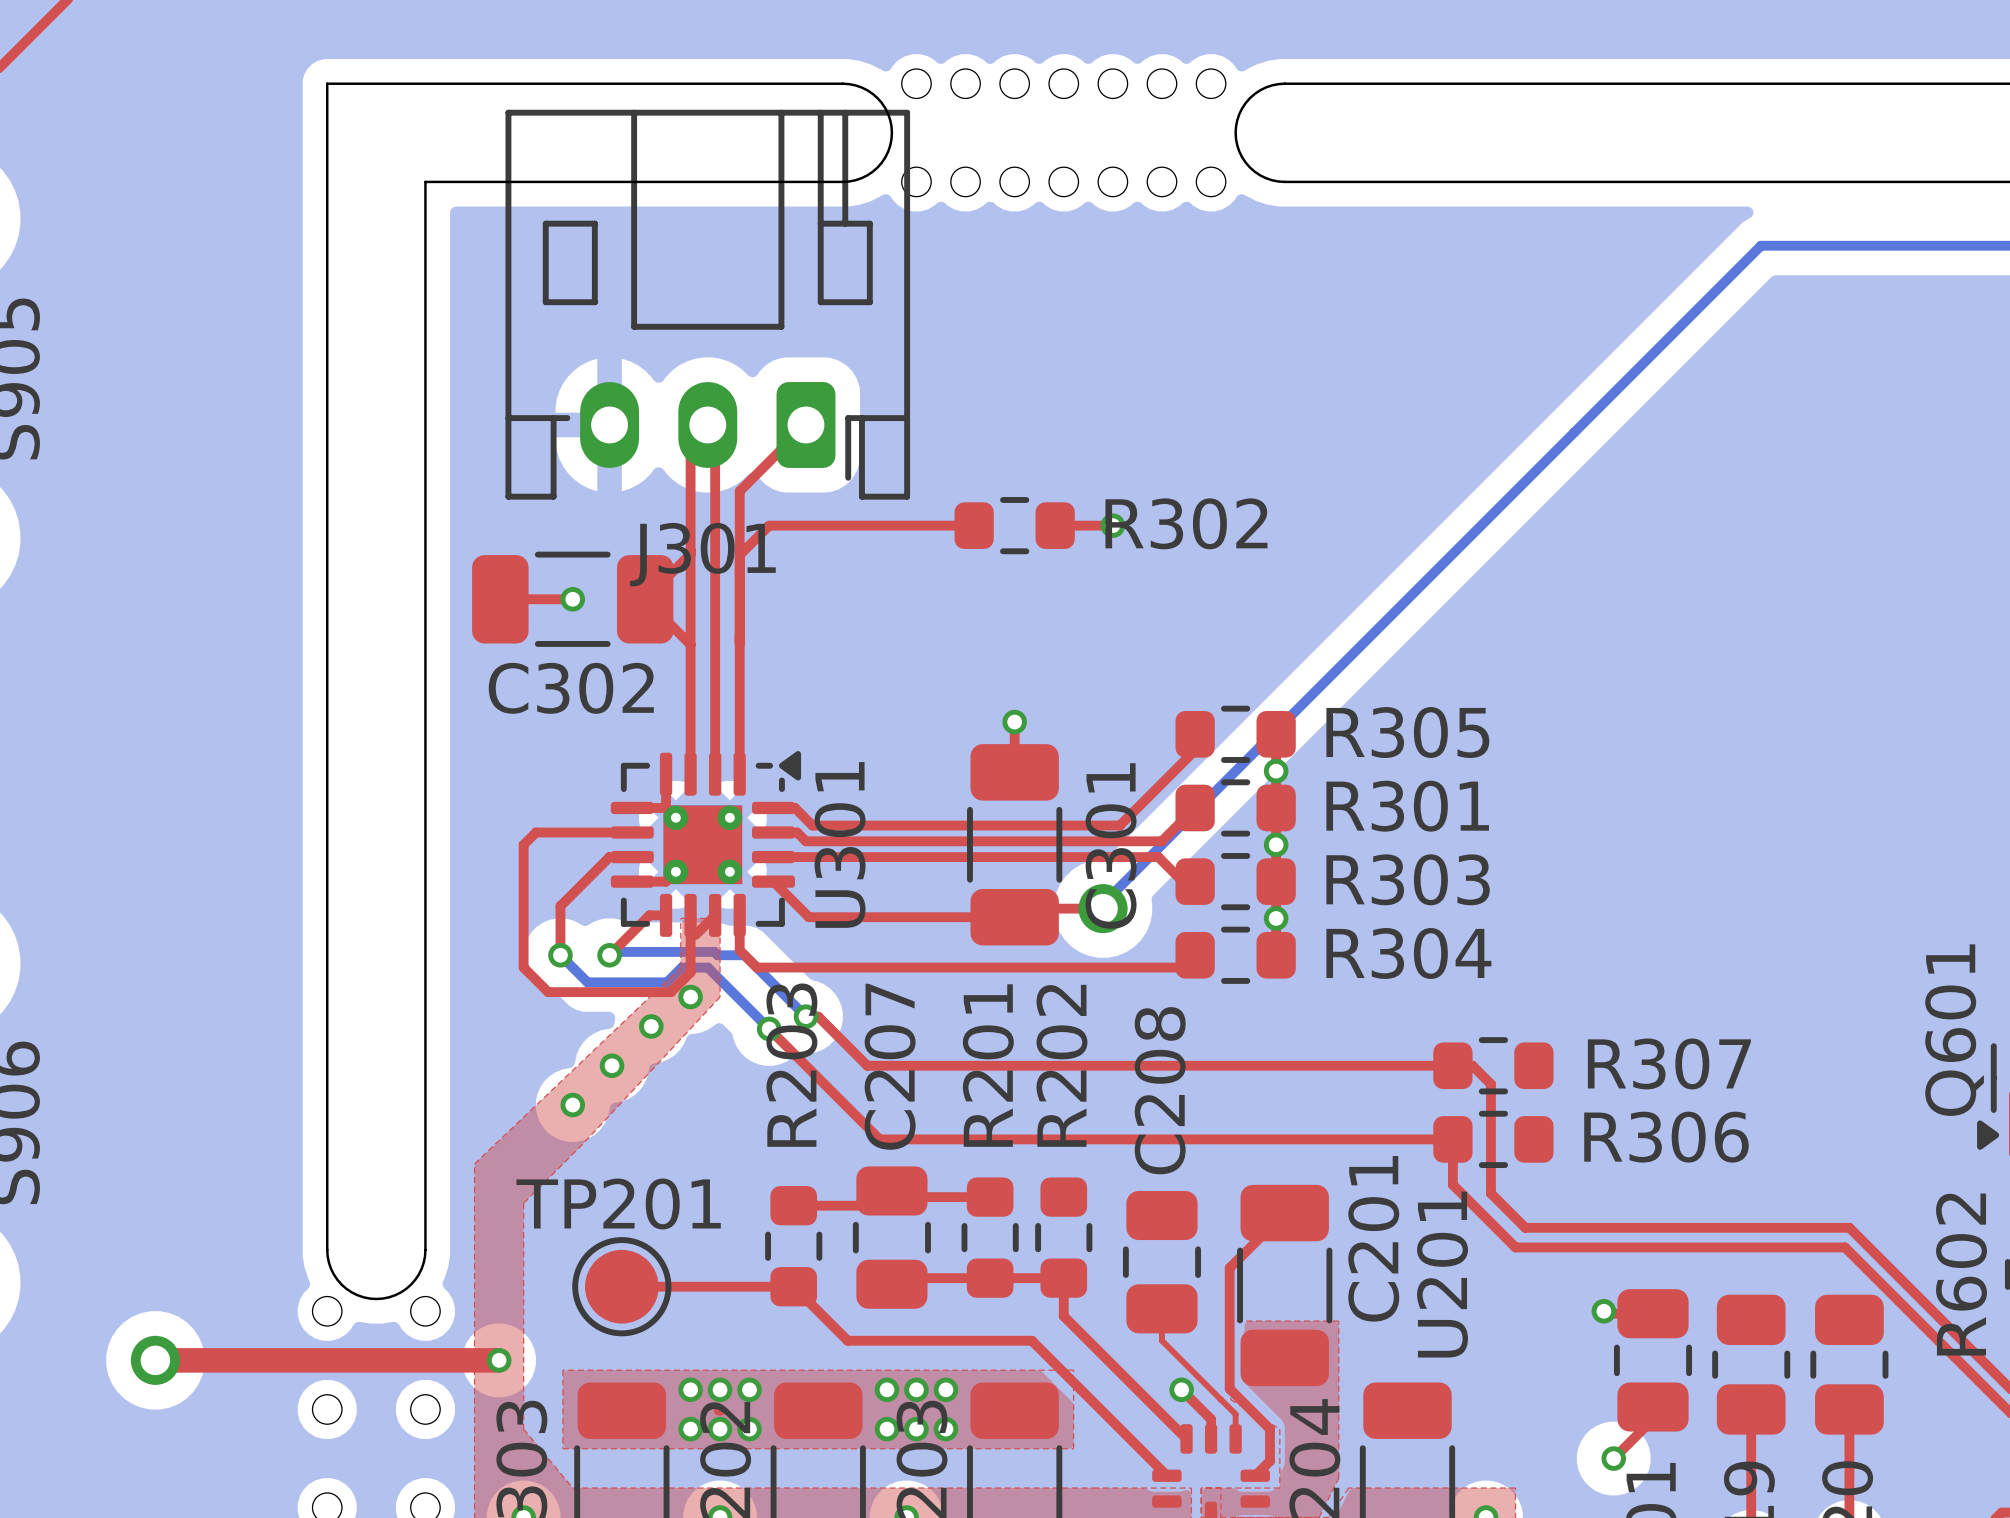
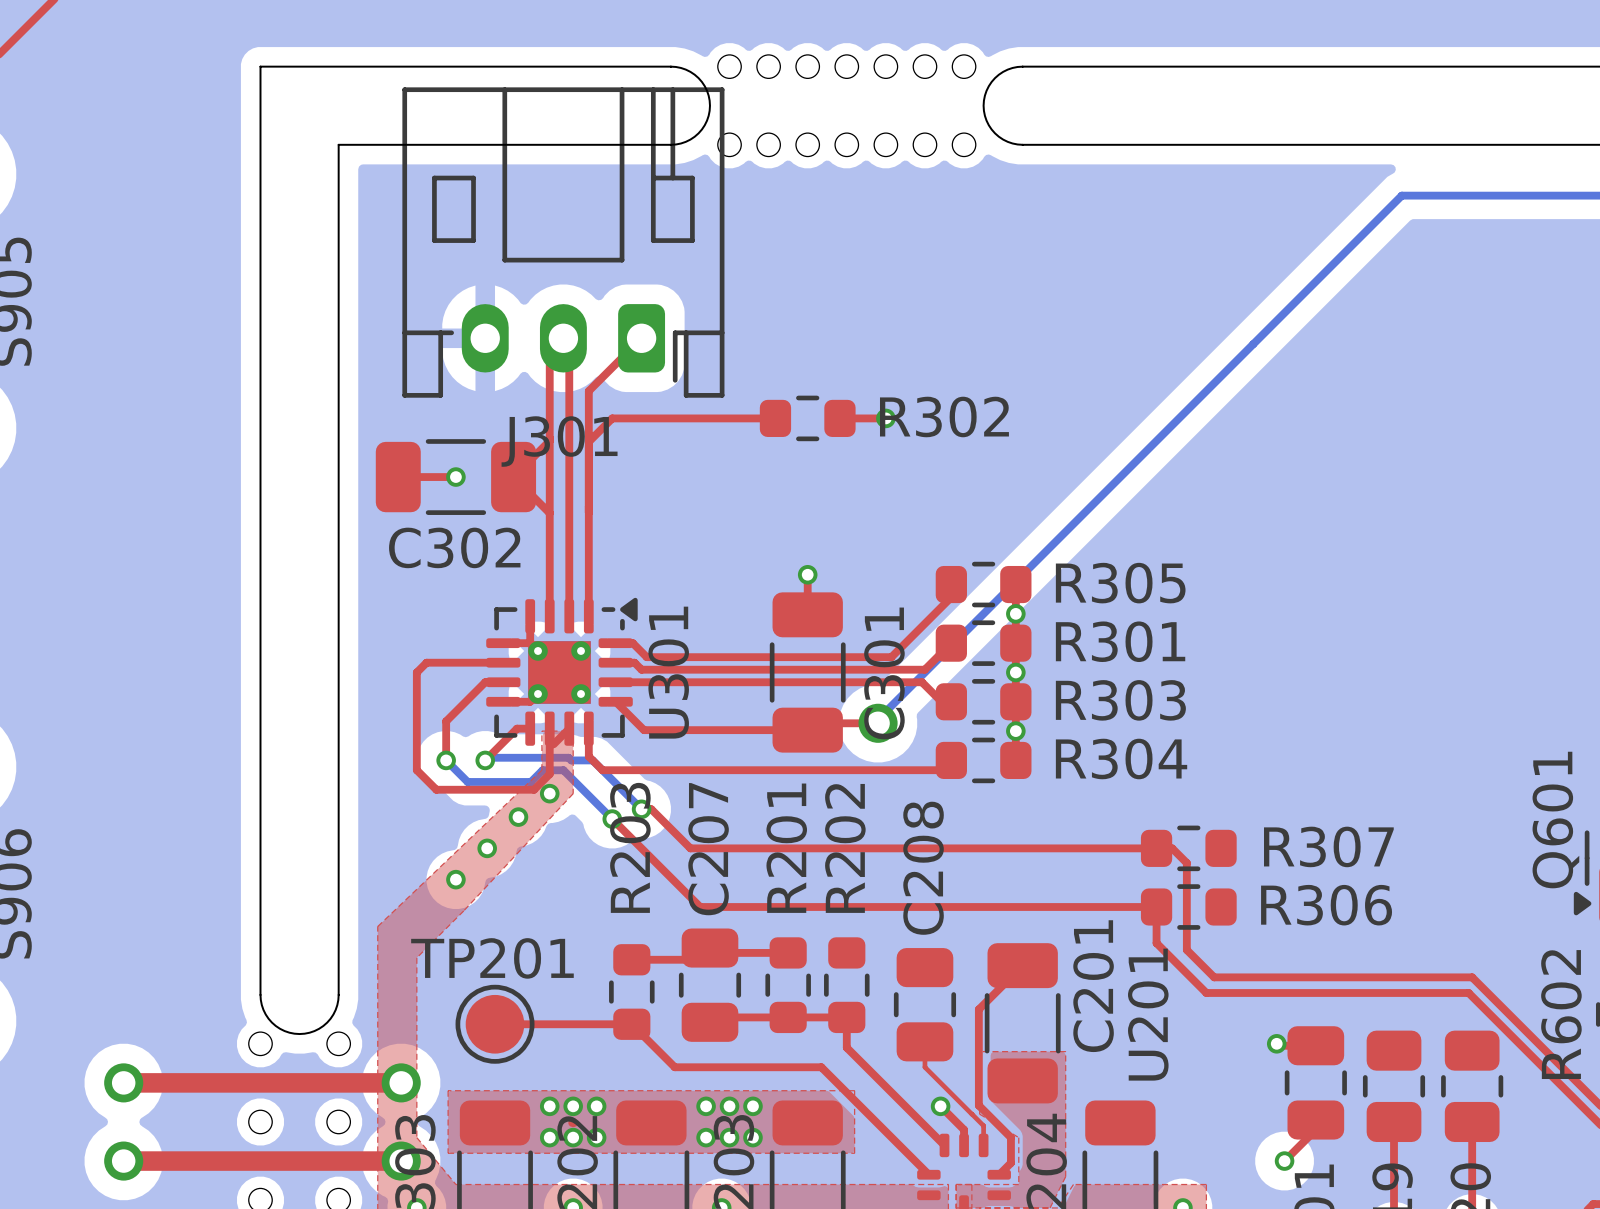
via size: [486, 1348, 512, 1373] -> [381, 1063, 421, 1103]
top track: none -> (123, 1161) (401, 1161)
via: none -> (123, 1161)
via: none -> (401, 1161)

